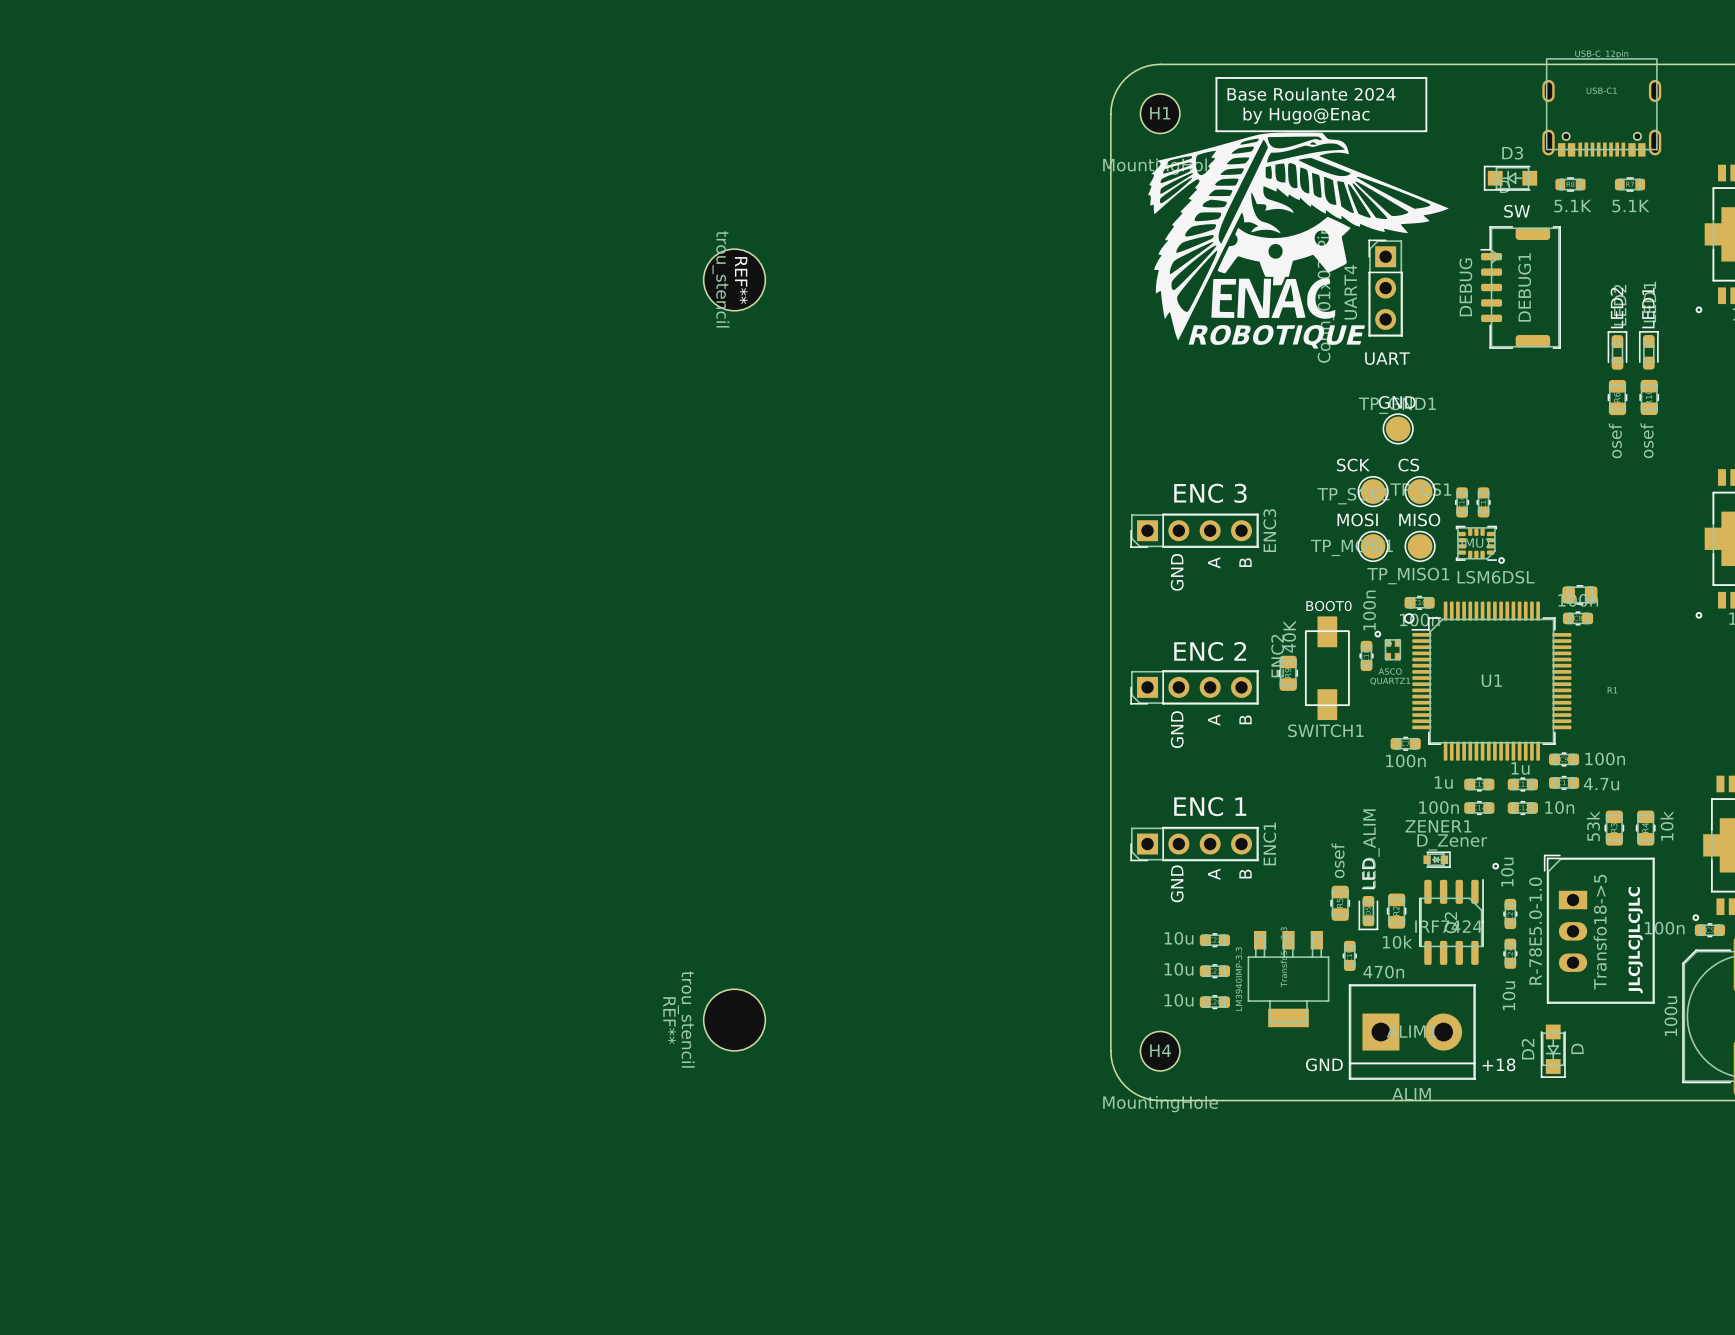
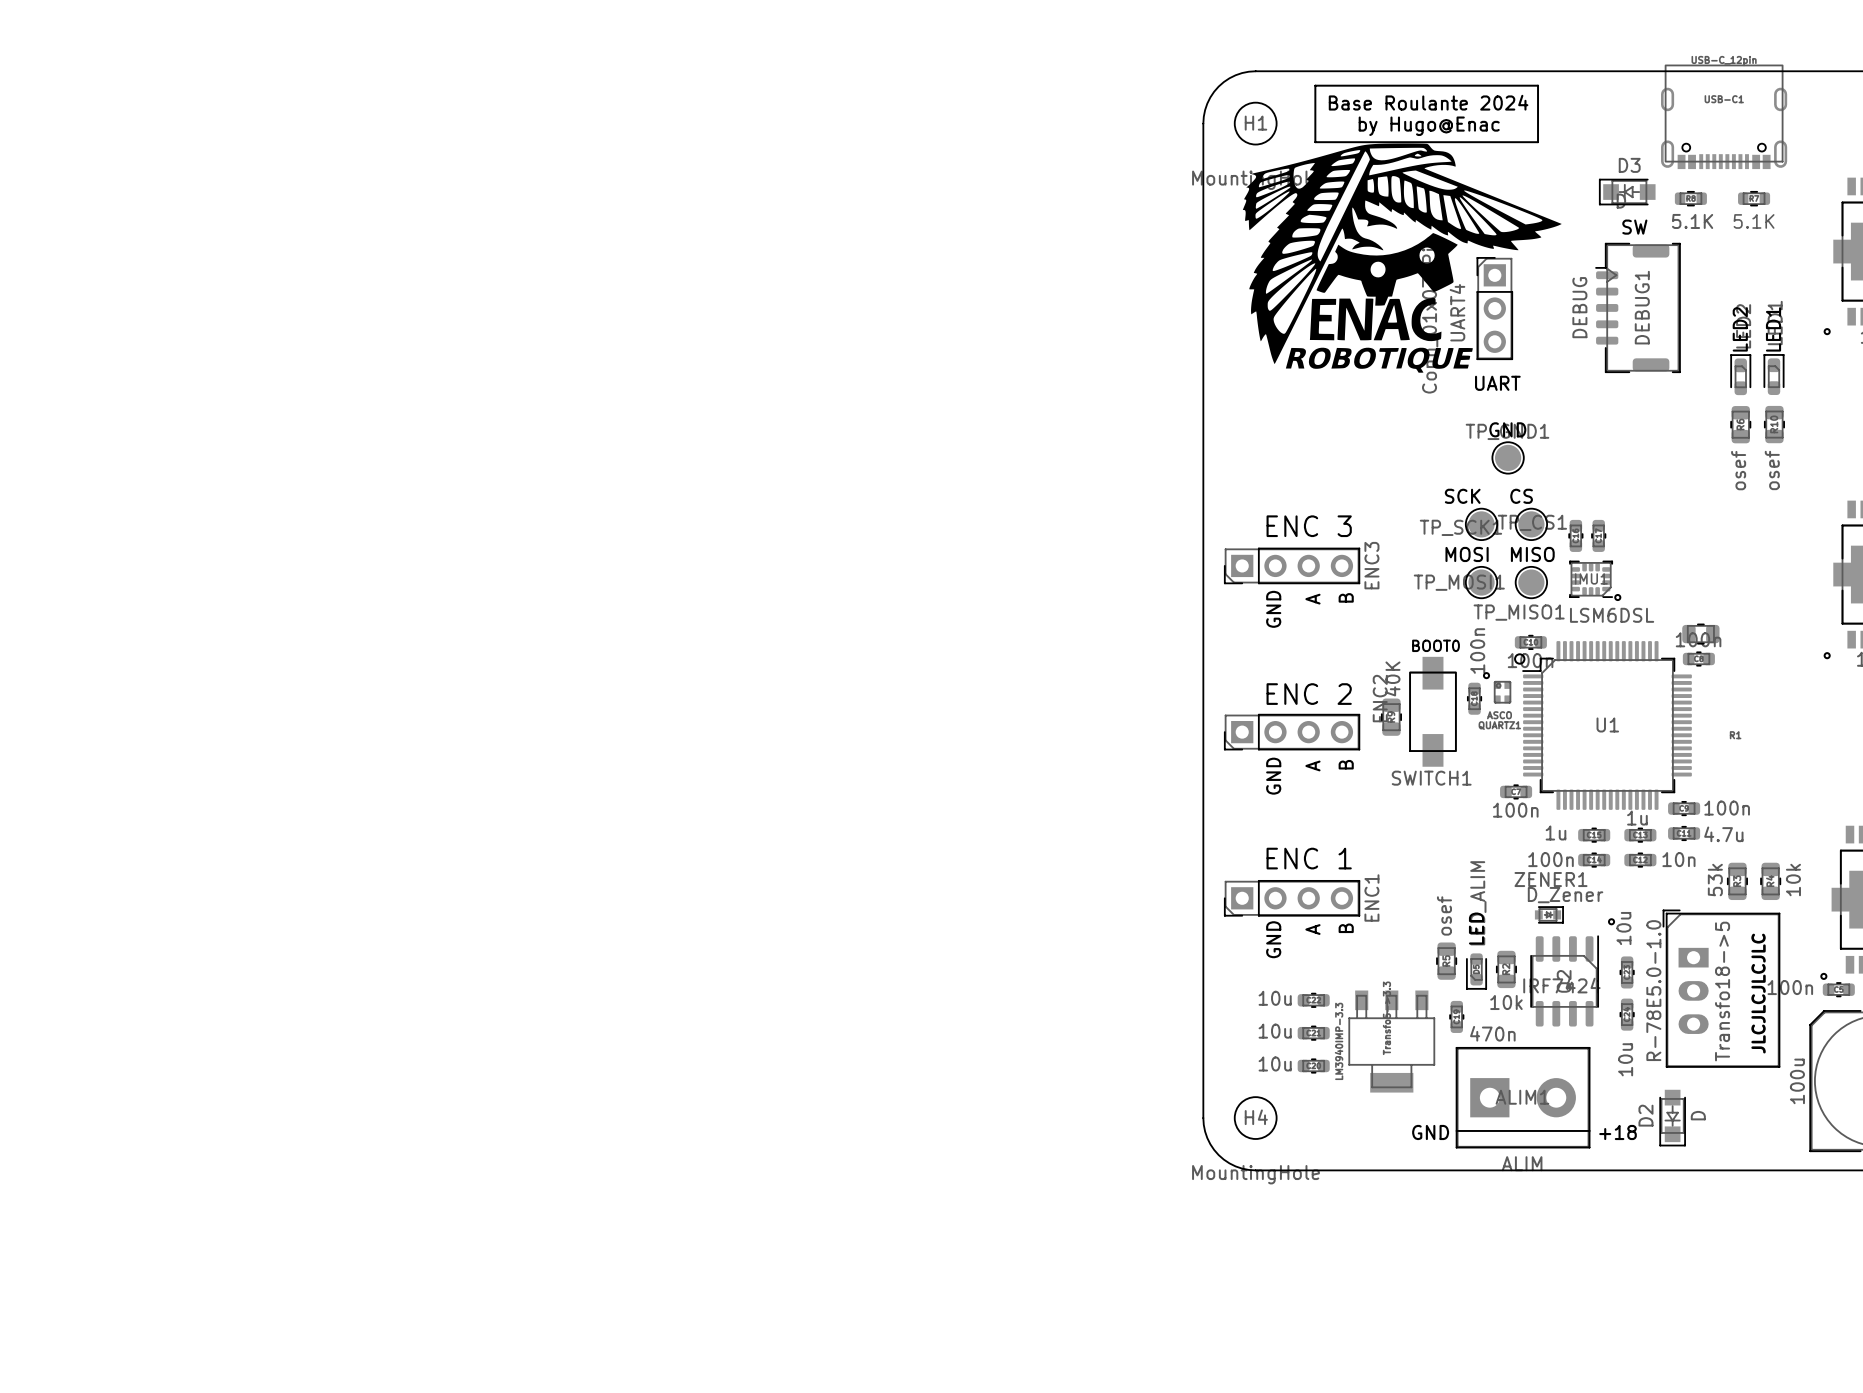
REF**: trou_stencil (734, 279) -> none
REF**: trou_stencil (734, 1020) -> none

